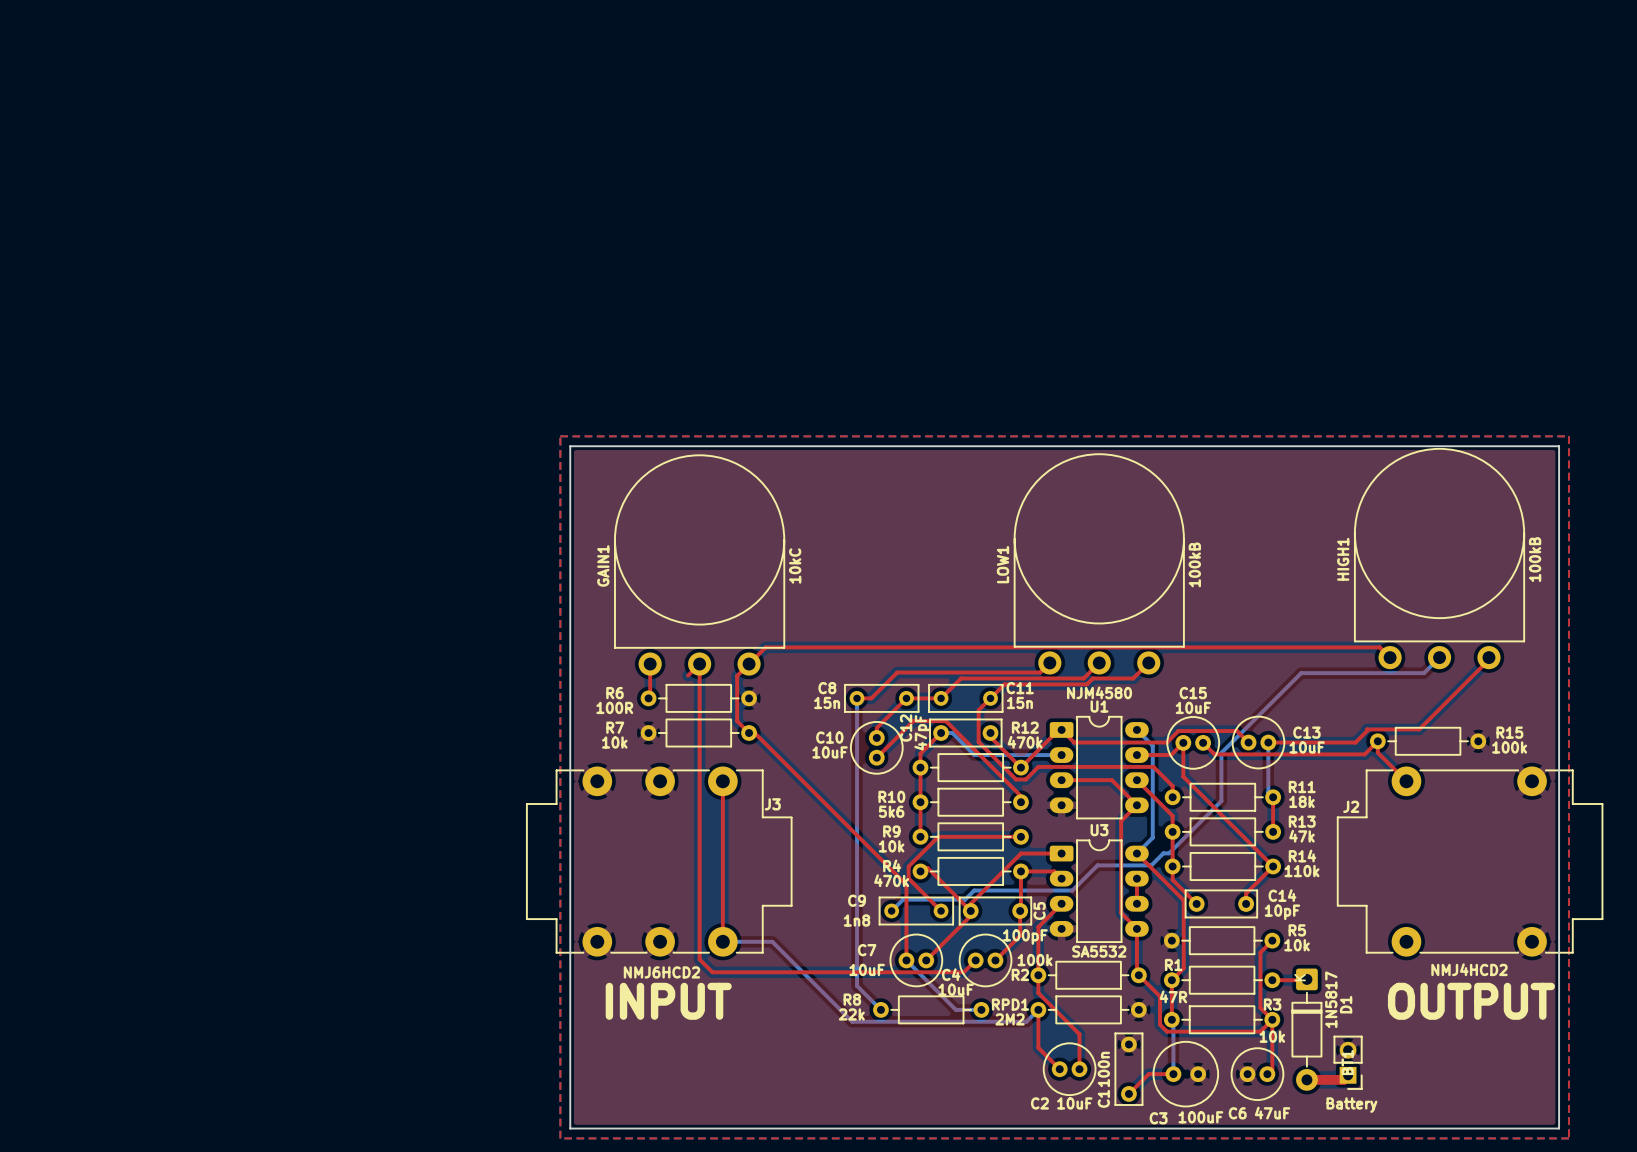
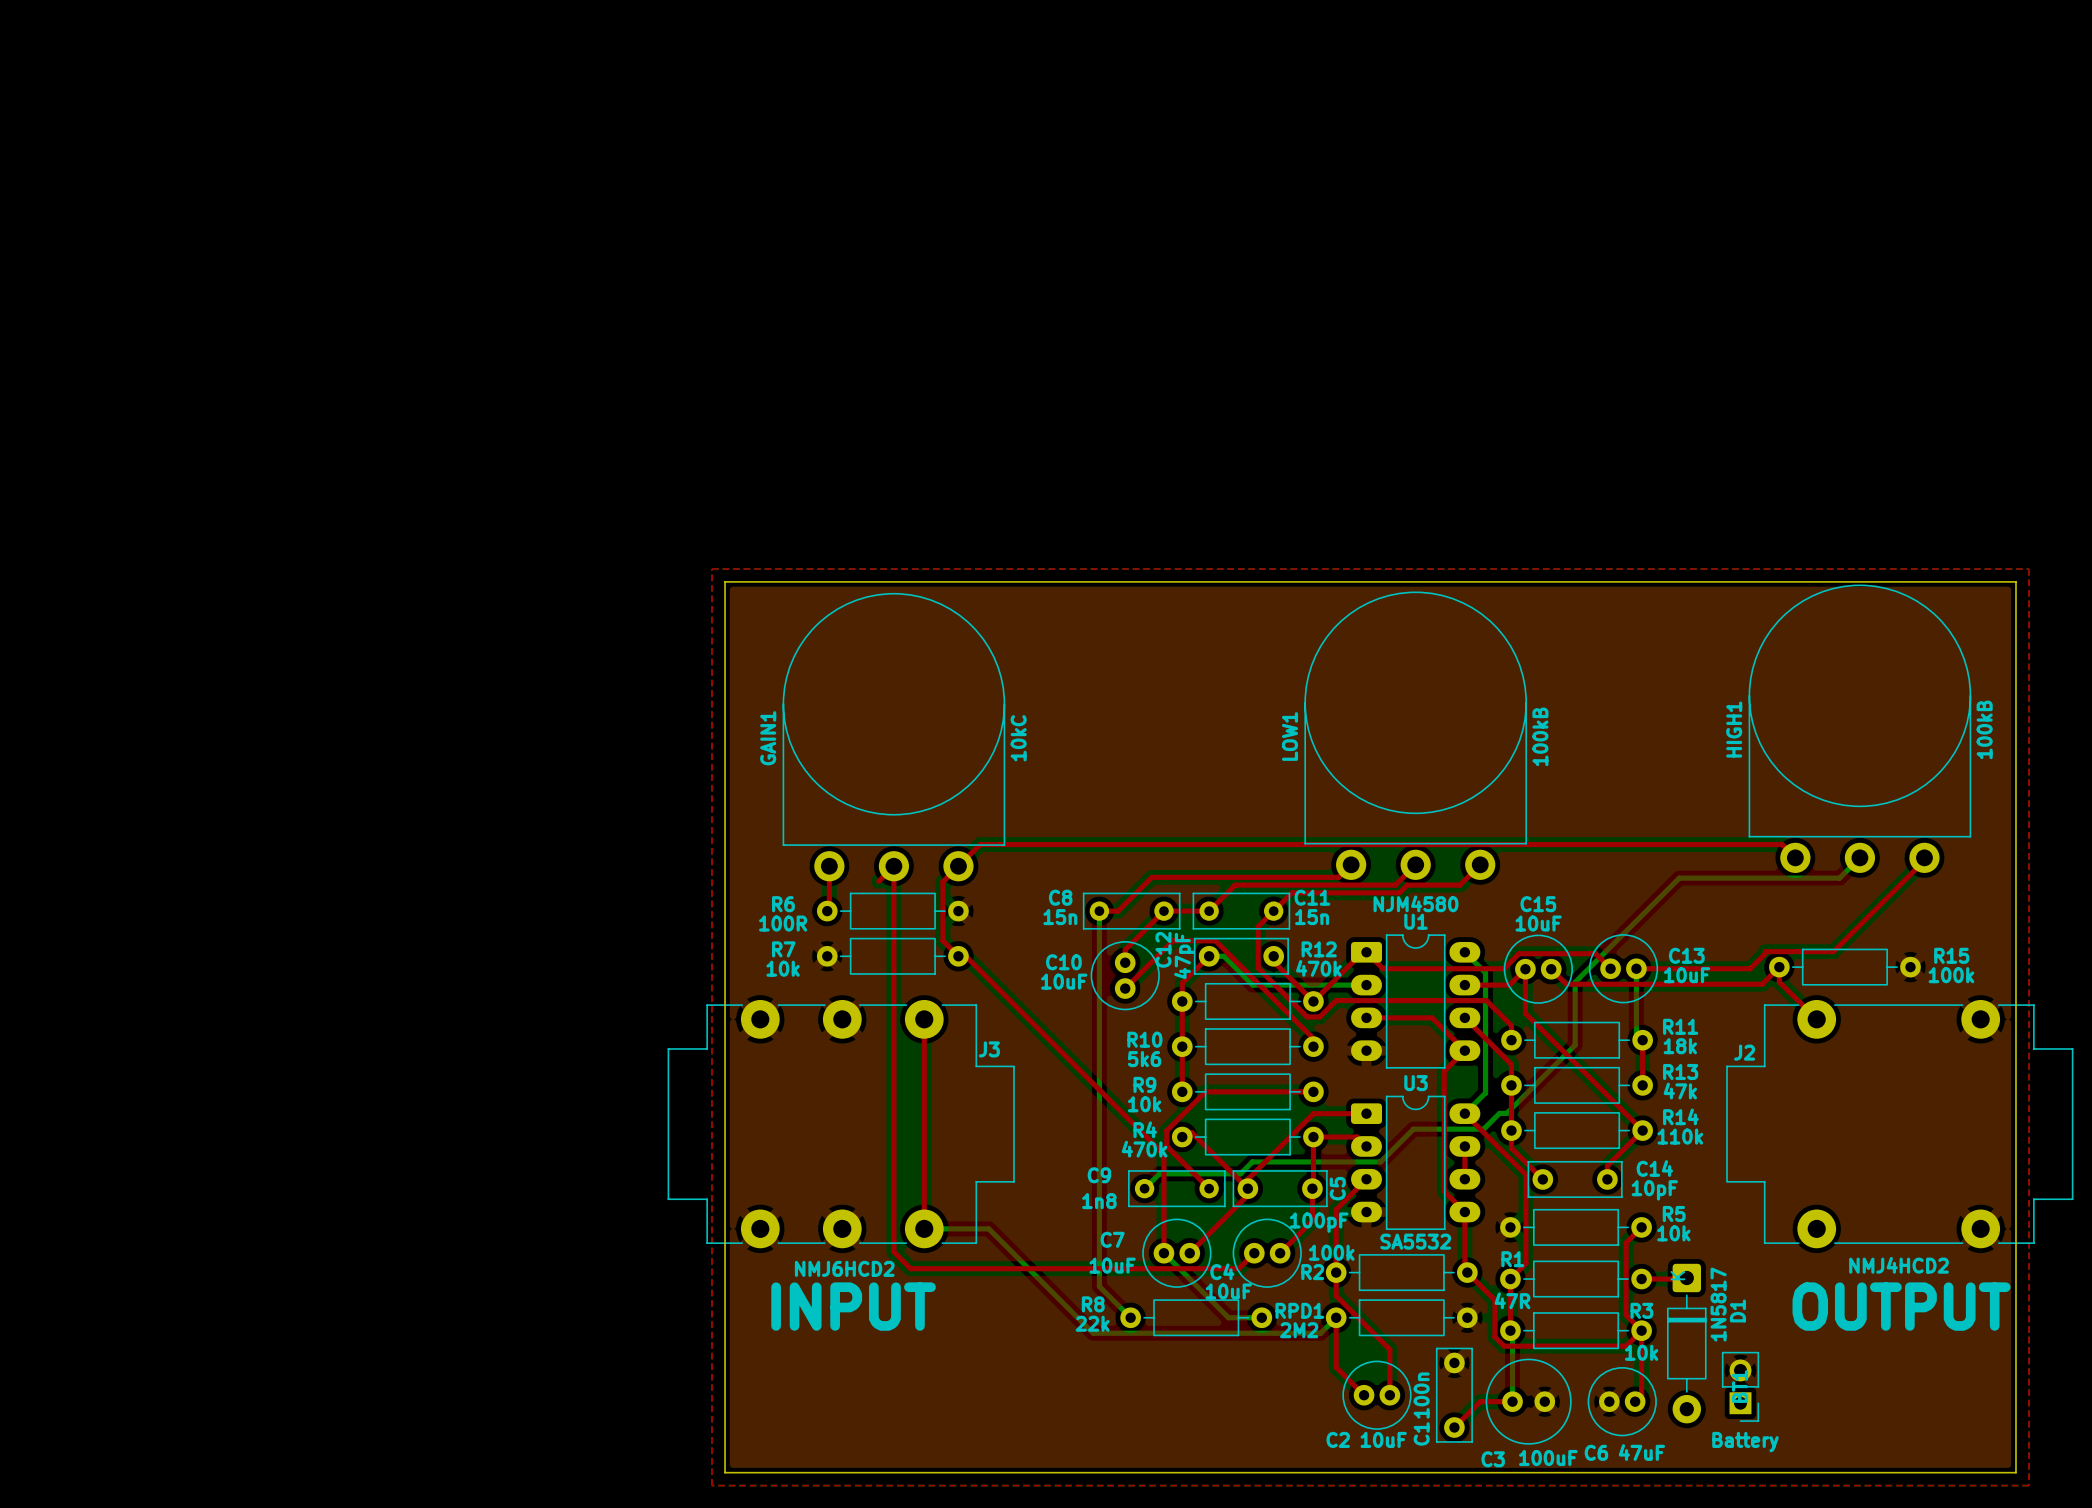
top track: (1348, 1075) (1343, 1079) (1306, 1079) -> none

